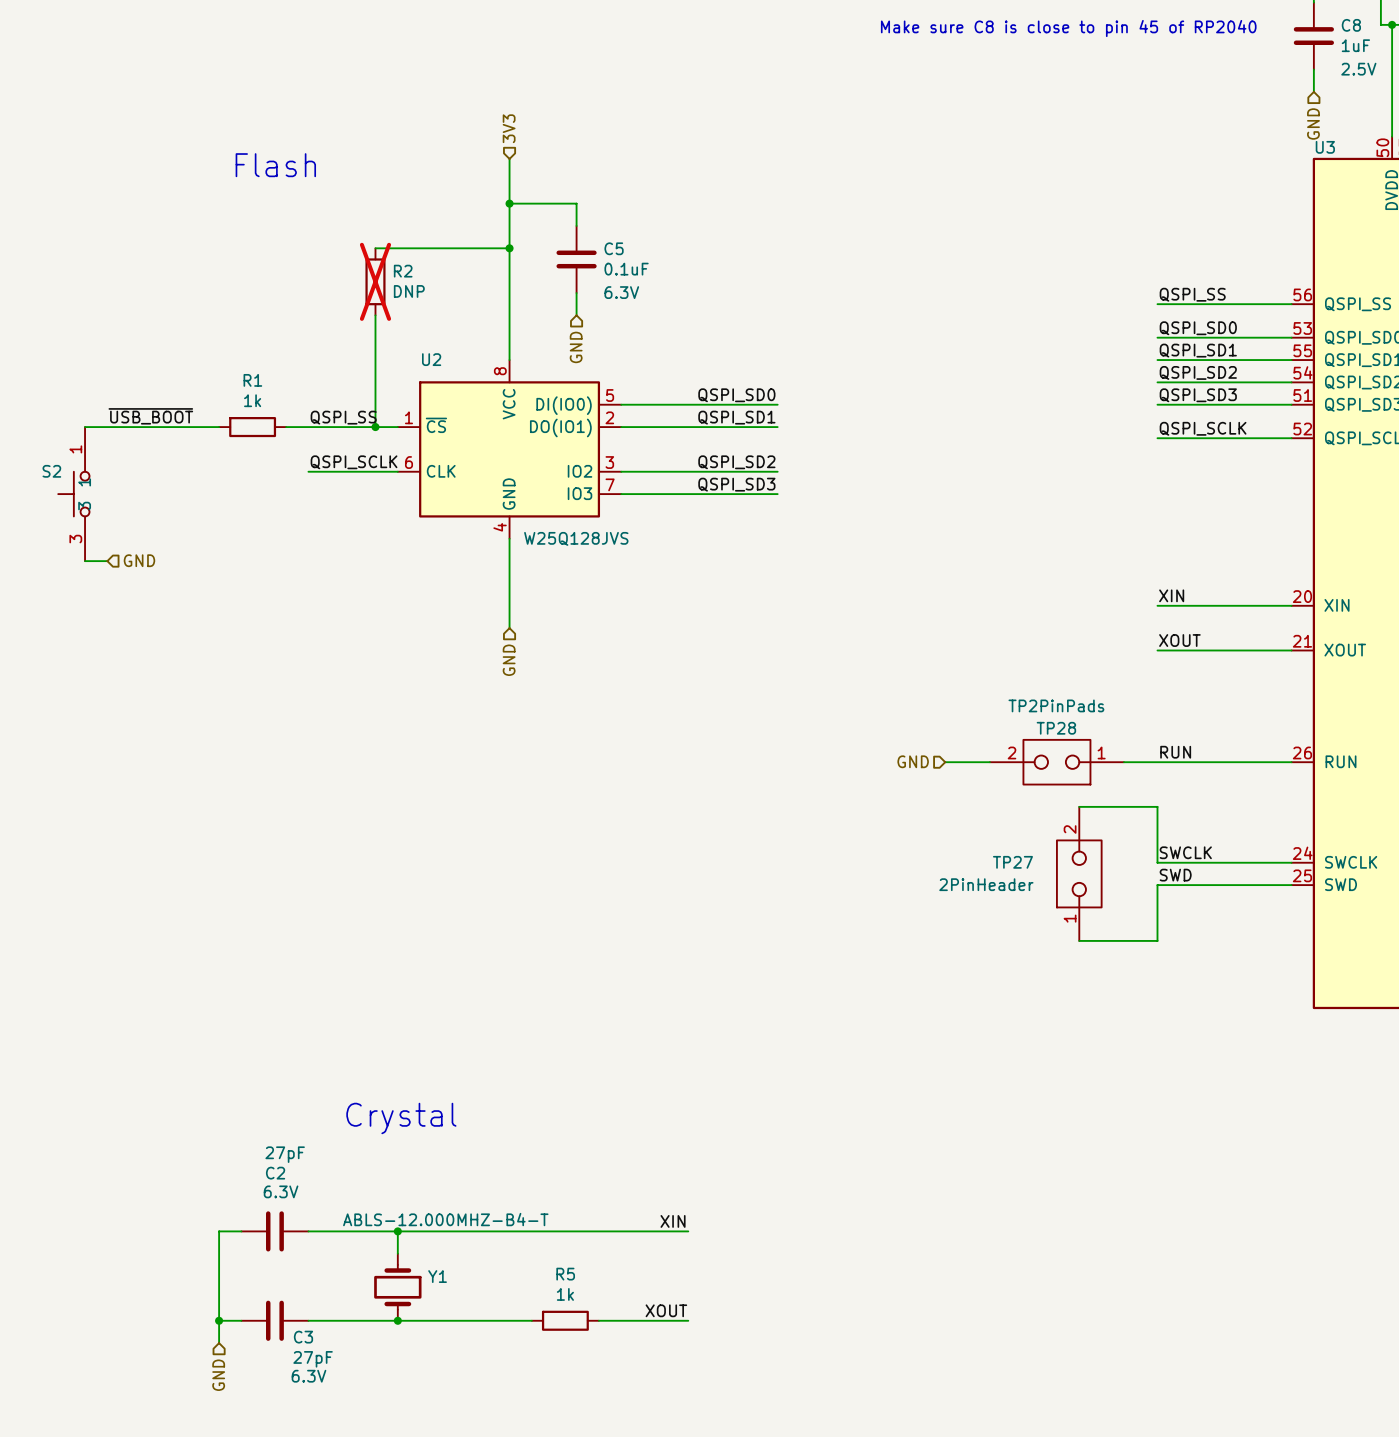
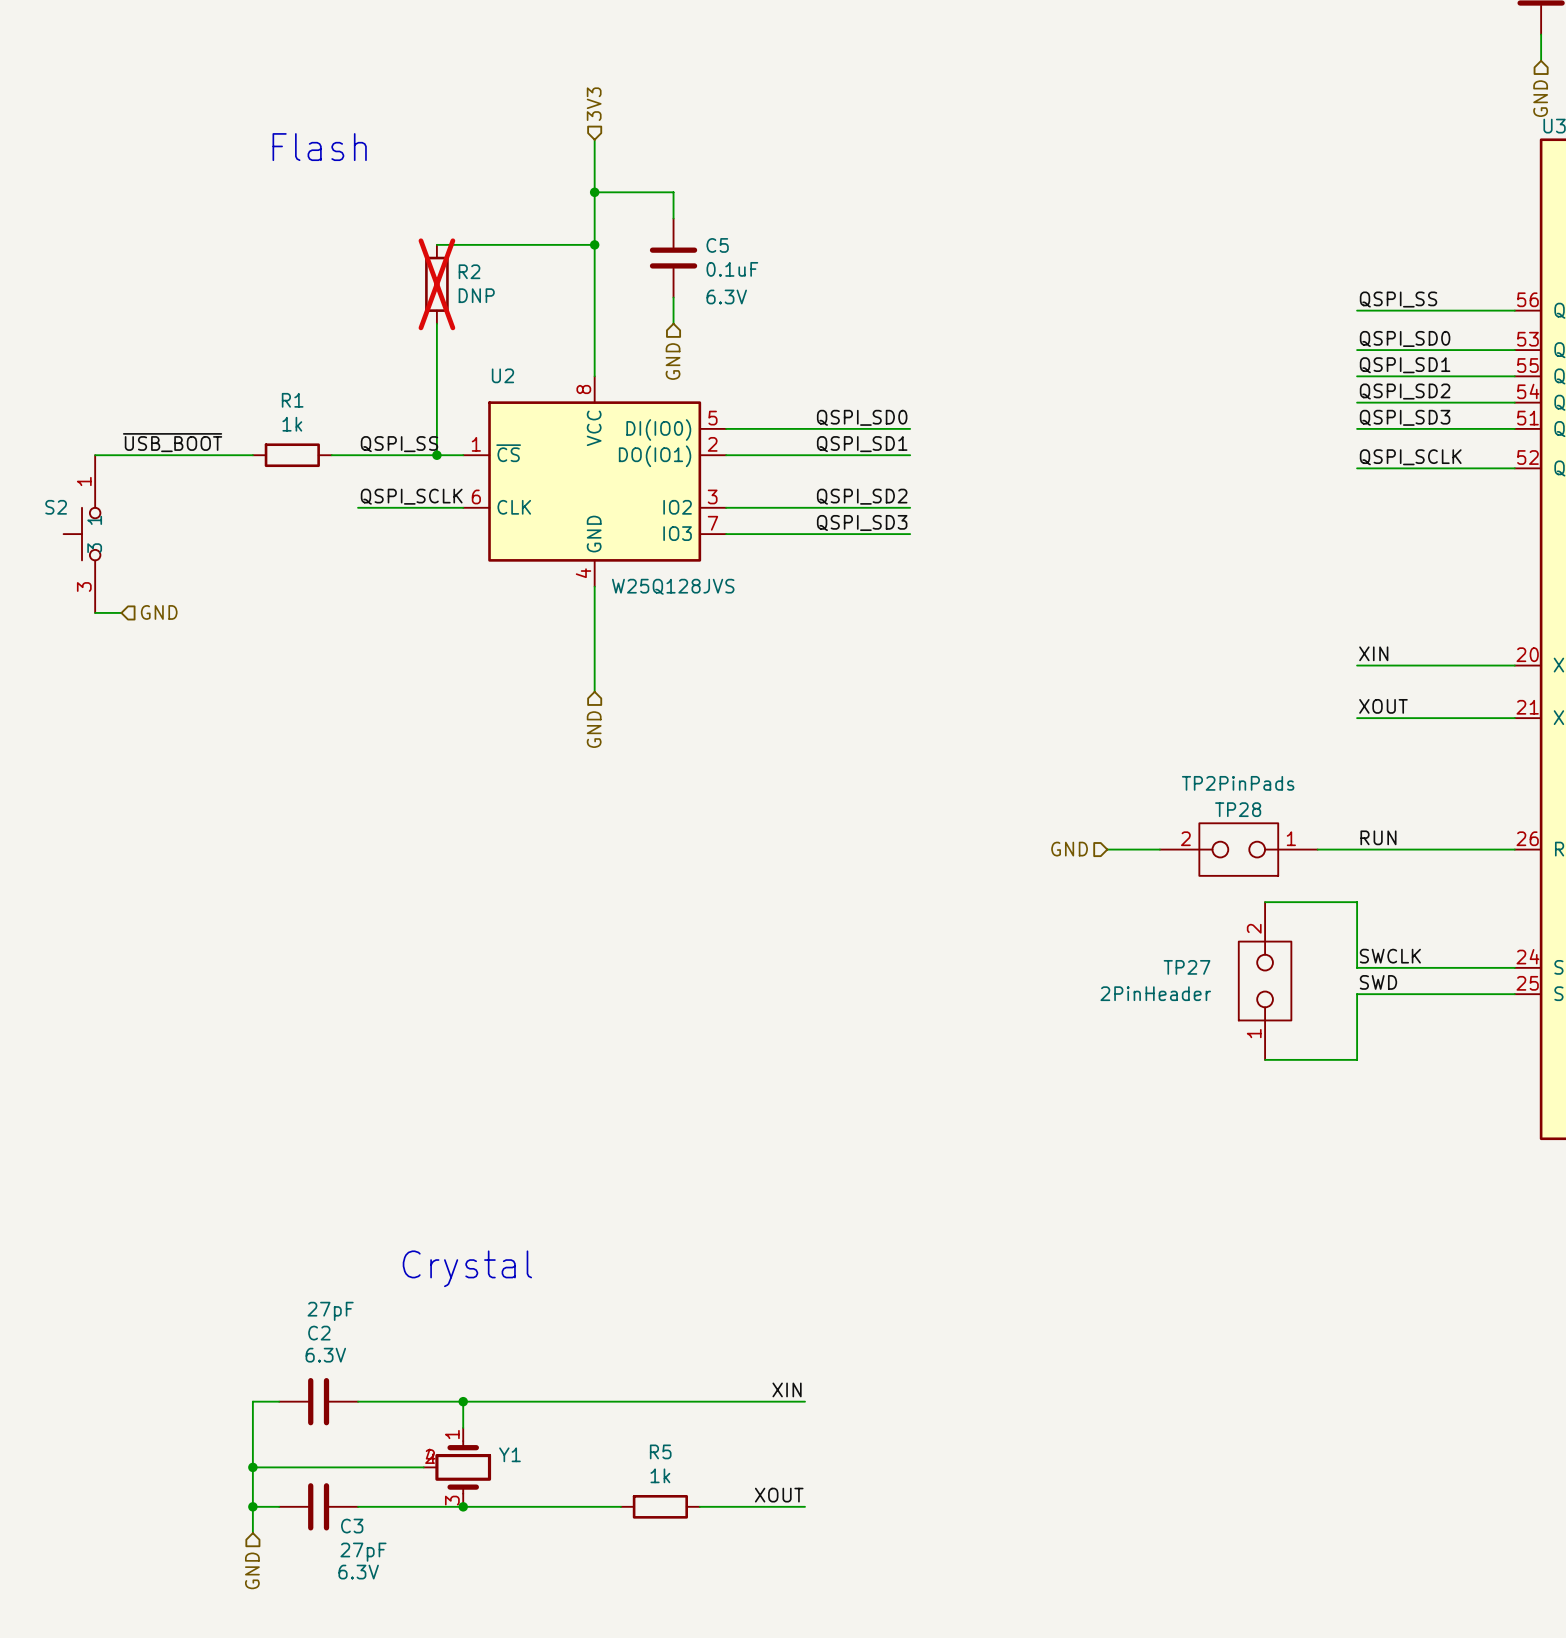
Y1 value: ABLS-12.000MHZ-B4-T (445, 1219) -> none
Y1 symbol: [374, 1253, 422, 1321] -> [423, 1427, 492, 1507]
wire: none -> (252, 1467) (423, 1467)
junction: none -> (252, 1467)

